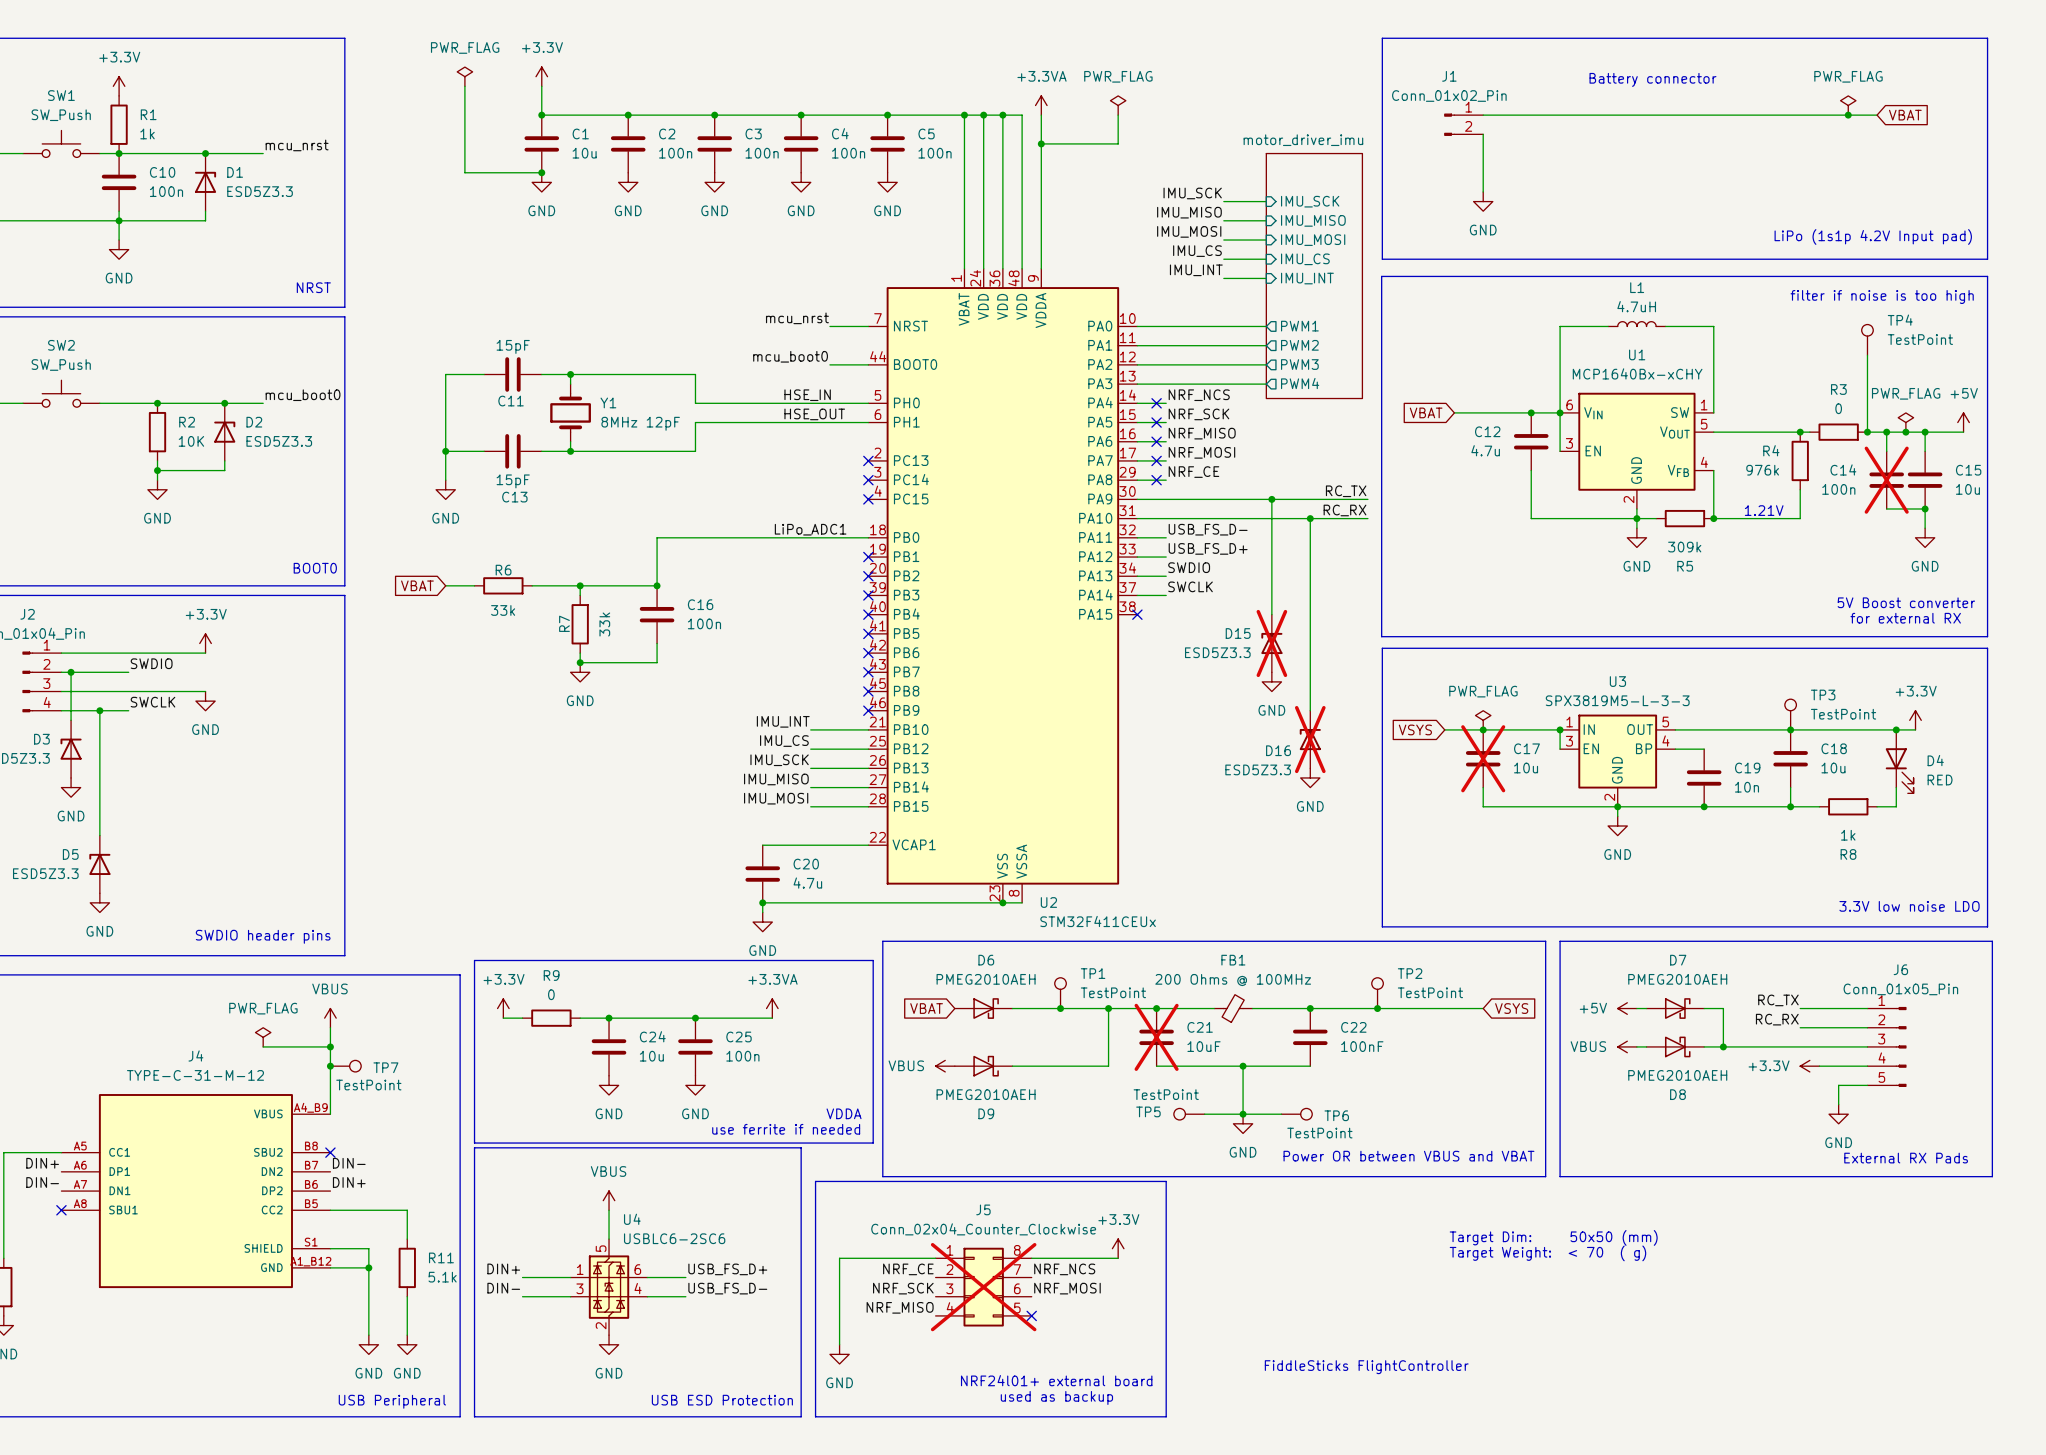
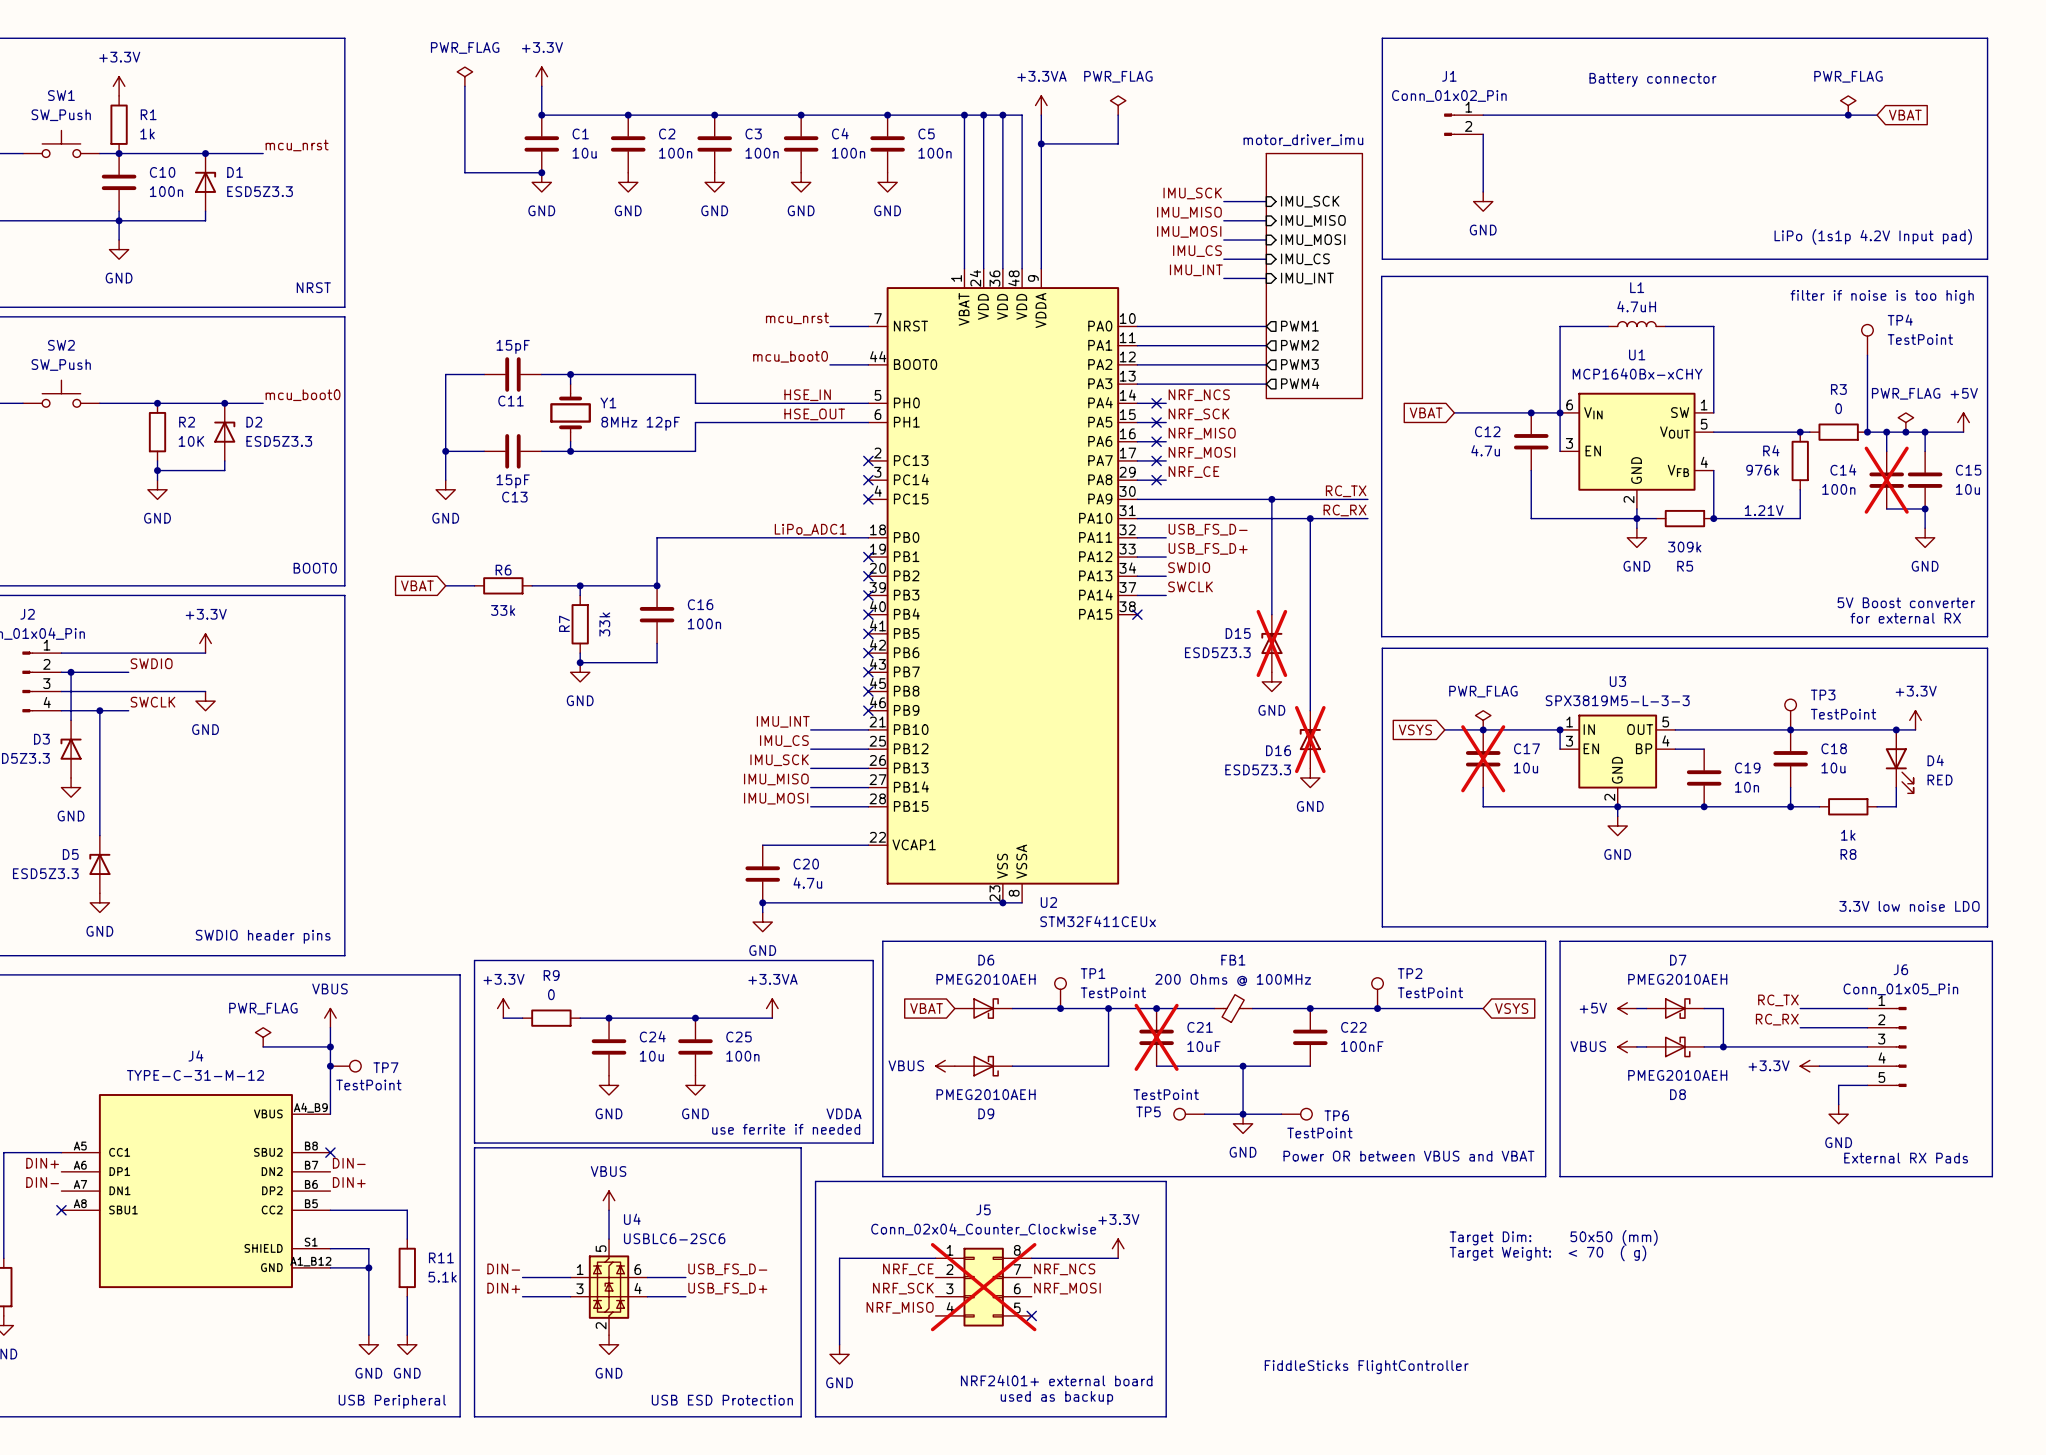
label: DIN+ (503, 1268) -> DIN- (503, 1268)
label: USB_FS_D+ (727, 1269) -> USB_FS_D- (727, 1269)
label: DIN- (503, 1288) -> DIN+ (503, 1288)
label: USB_FS_D- (727, 1288) -> USB_FS_D+ (727, 1288)

